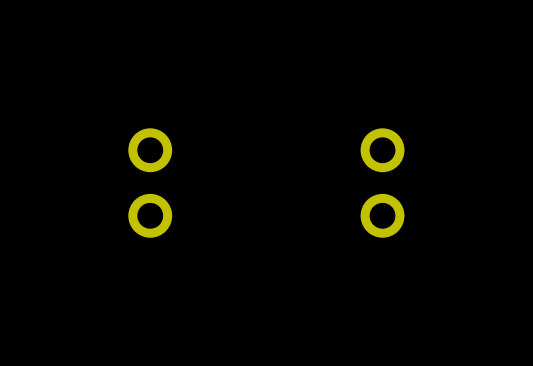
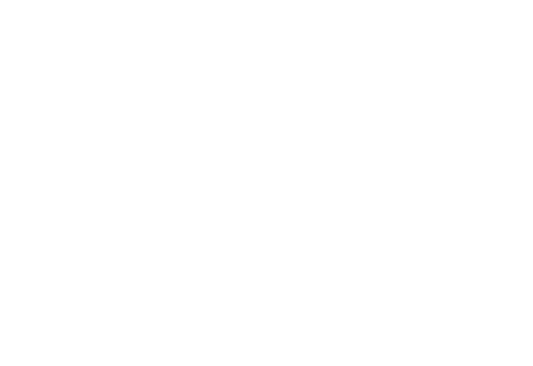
part: (150, 183) -> none
part: (382, 183) -> none

